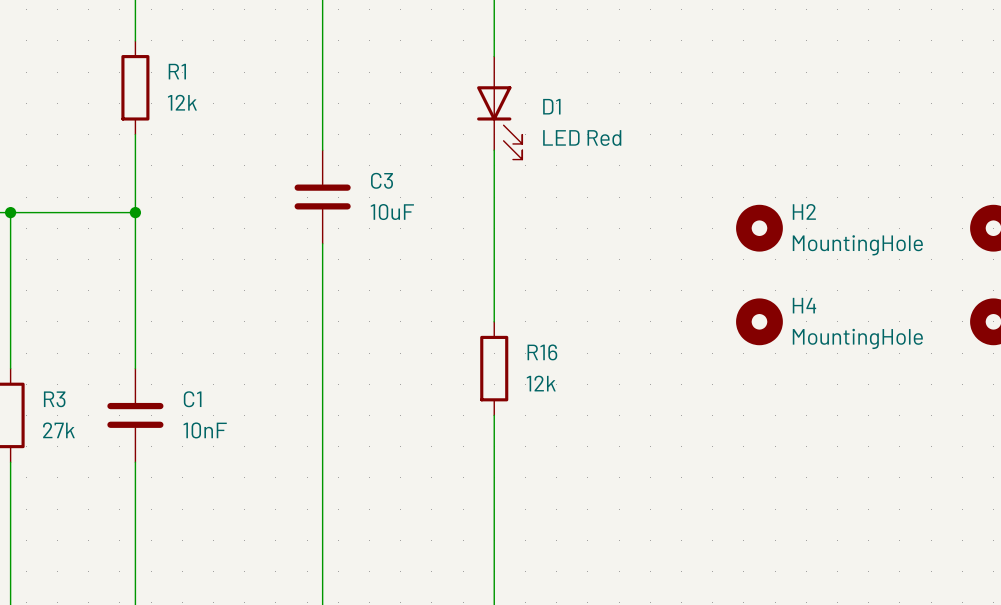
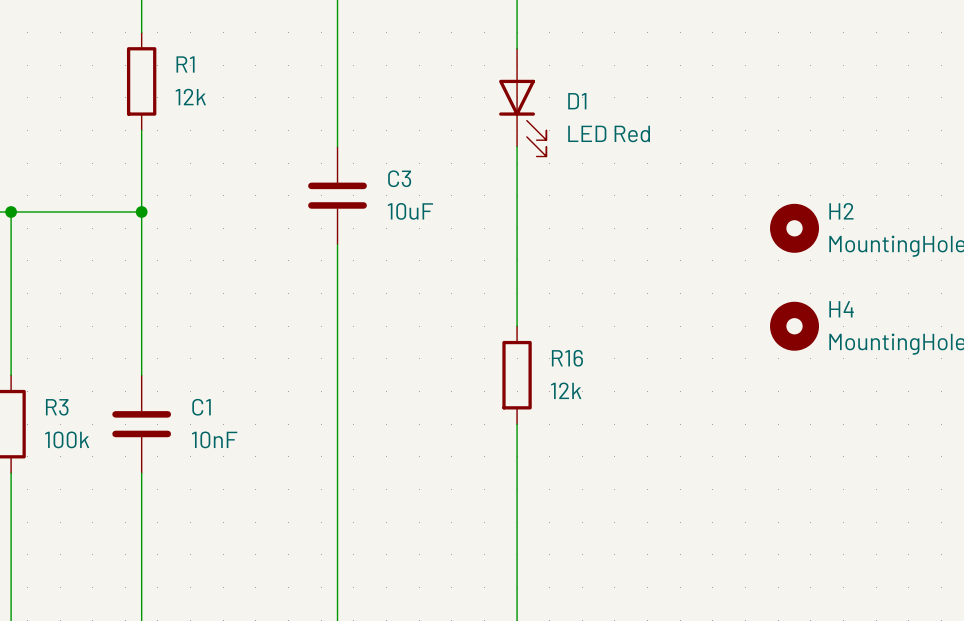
R3 value: 27k (58, 430) -> 100k (67, 439)

